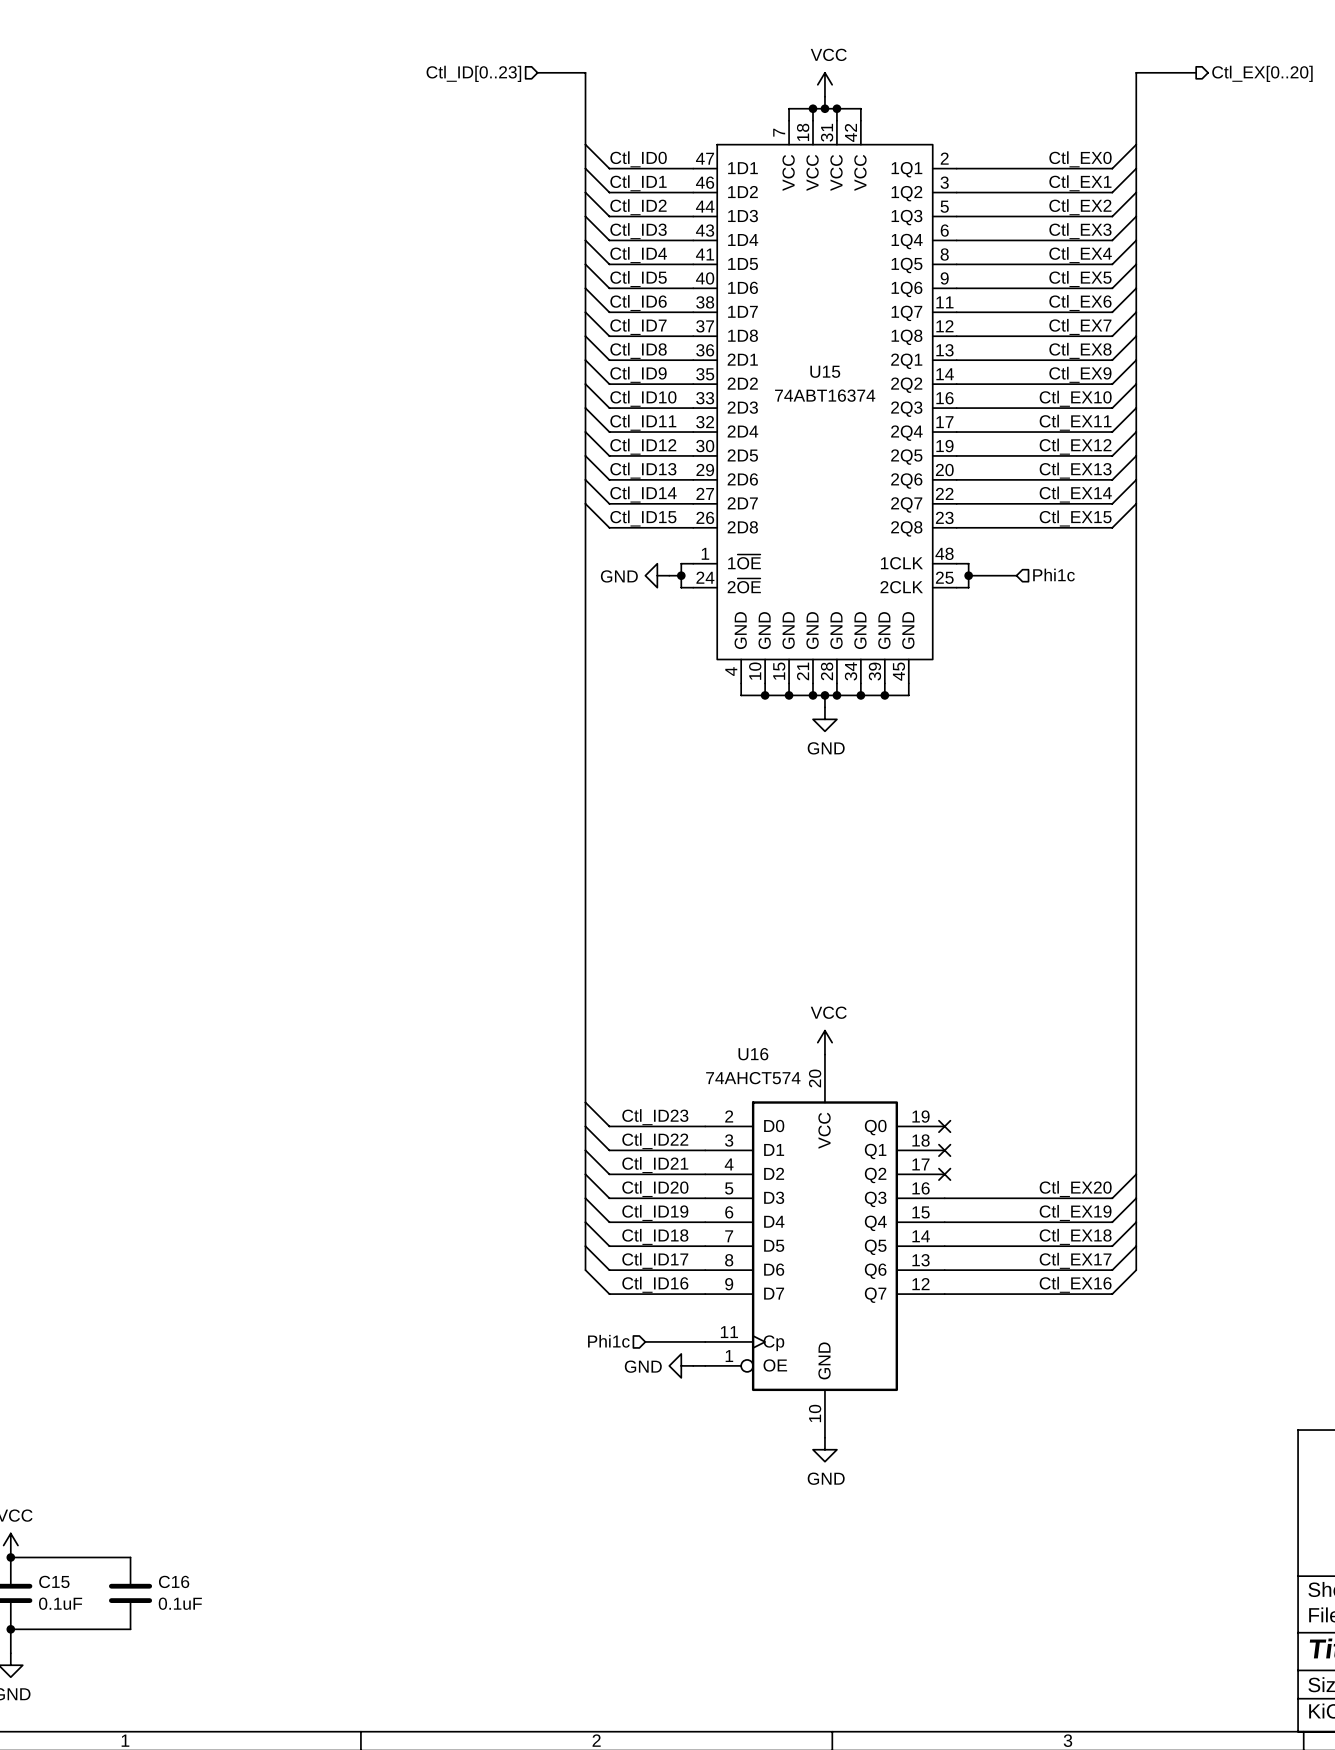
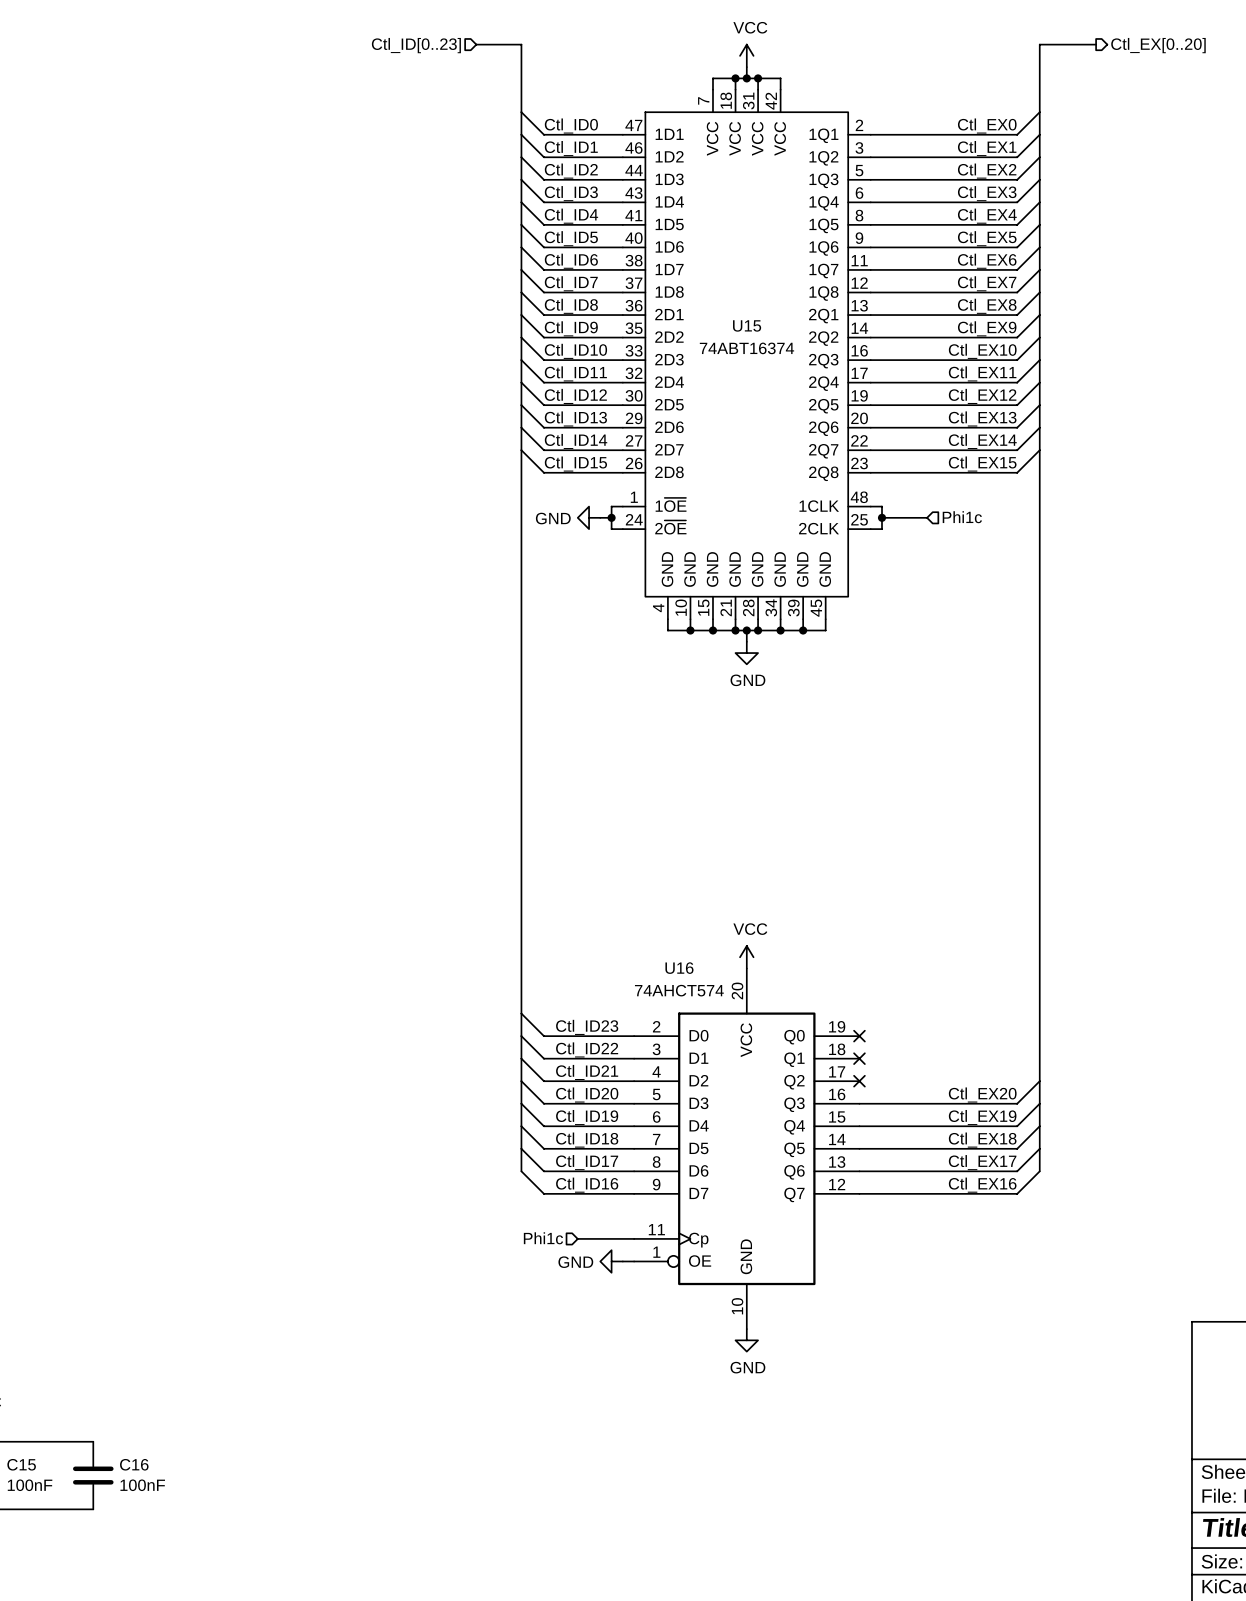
C15 value: 0.1uF (60, 1603) -> 100nF (30, 1485)
C16 value: 0.1uF (180, 1603) -> 100nF (142, 1485)

